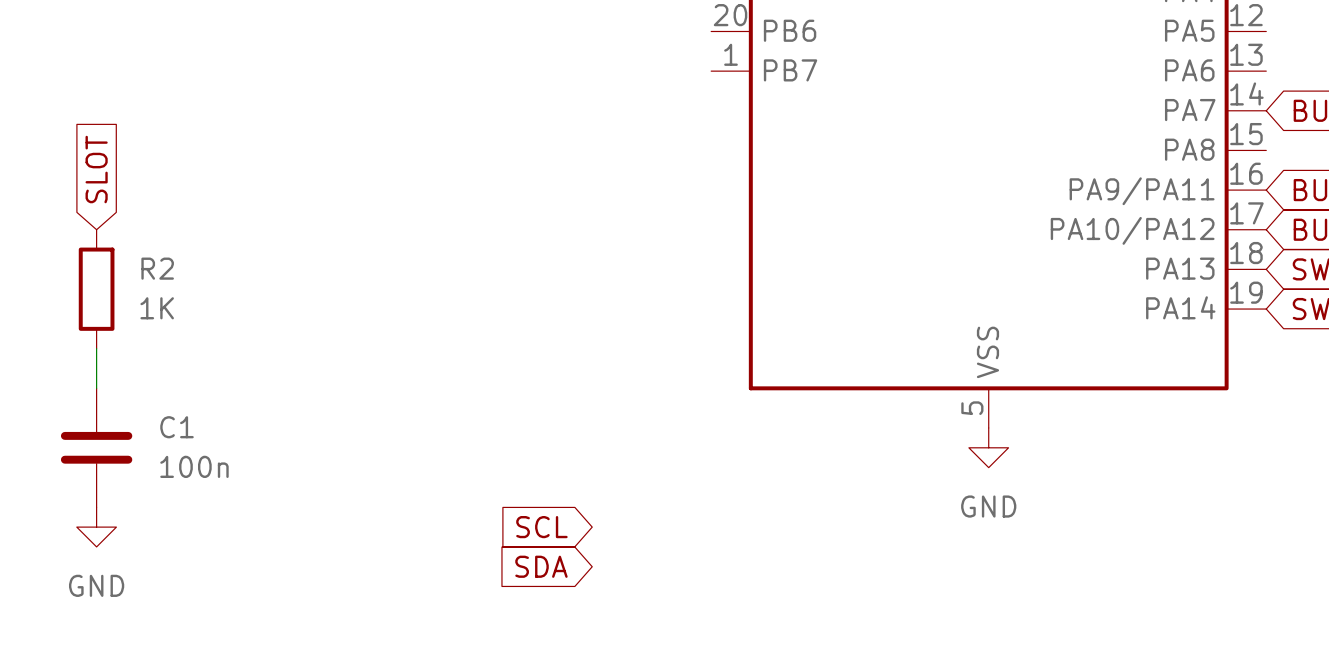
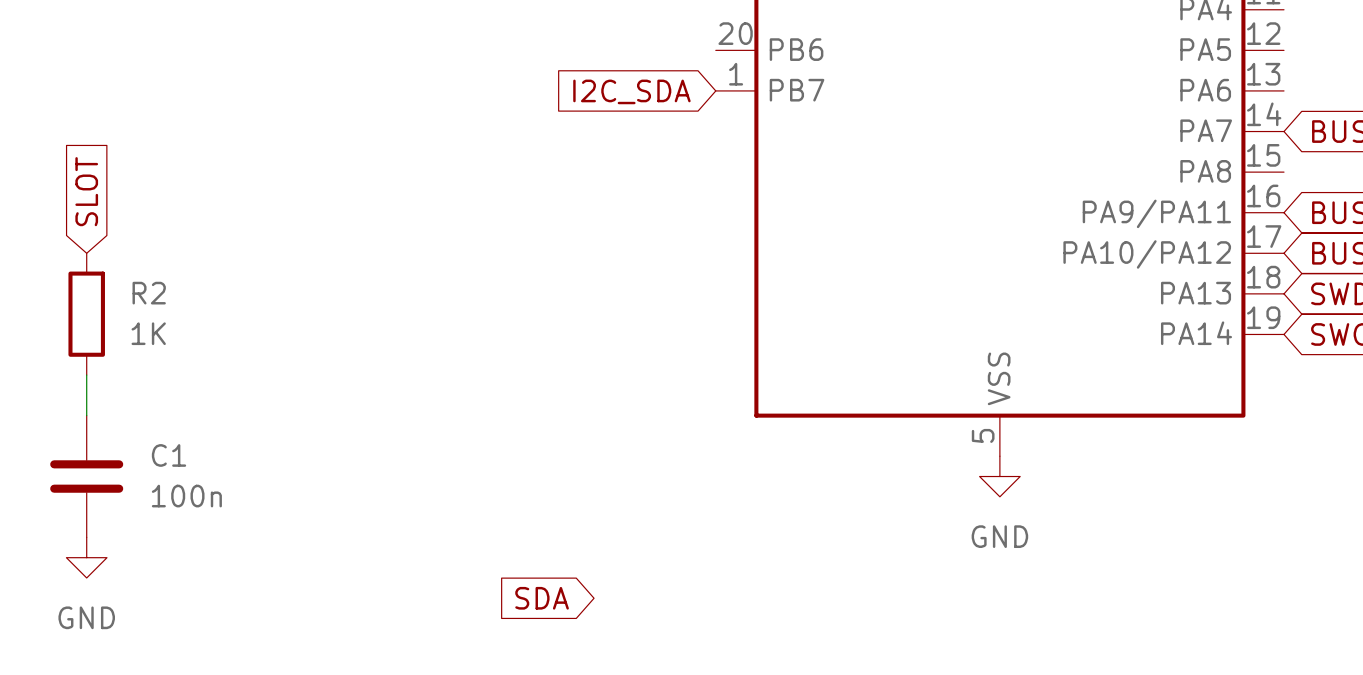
global label: none -> I2C_SDA (631, 91)
global label: SCL (541, 527) -> none

